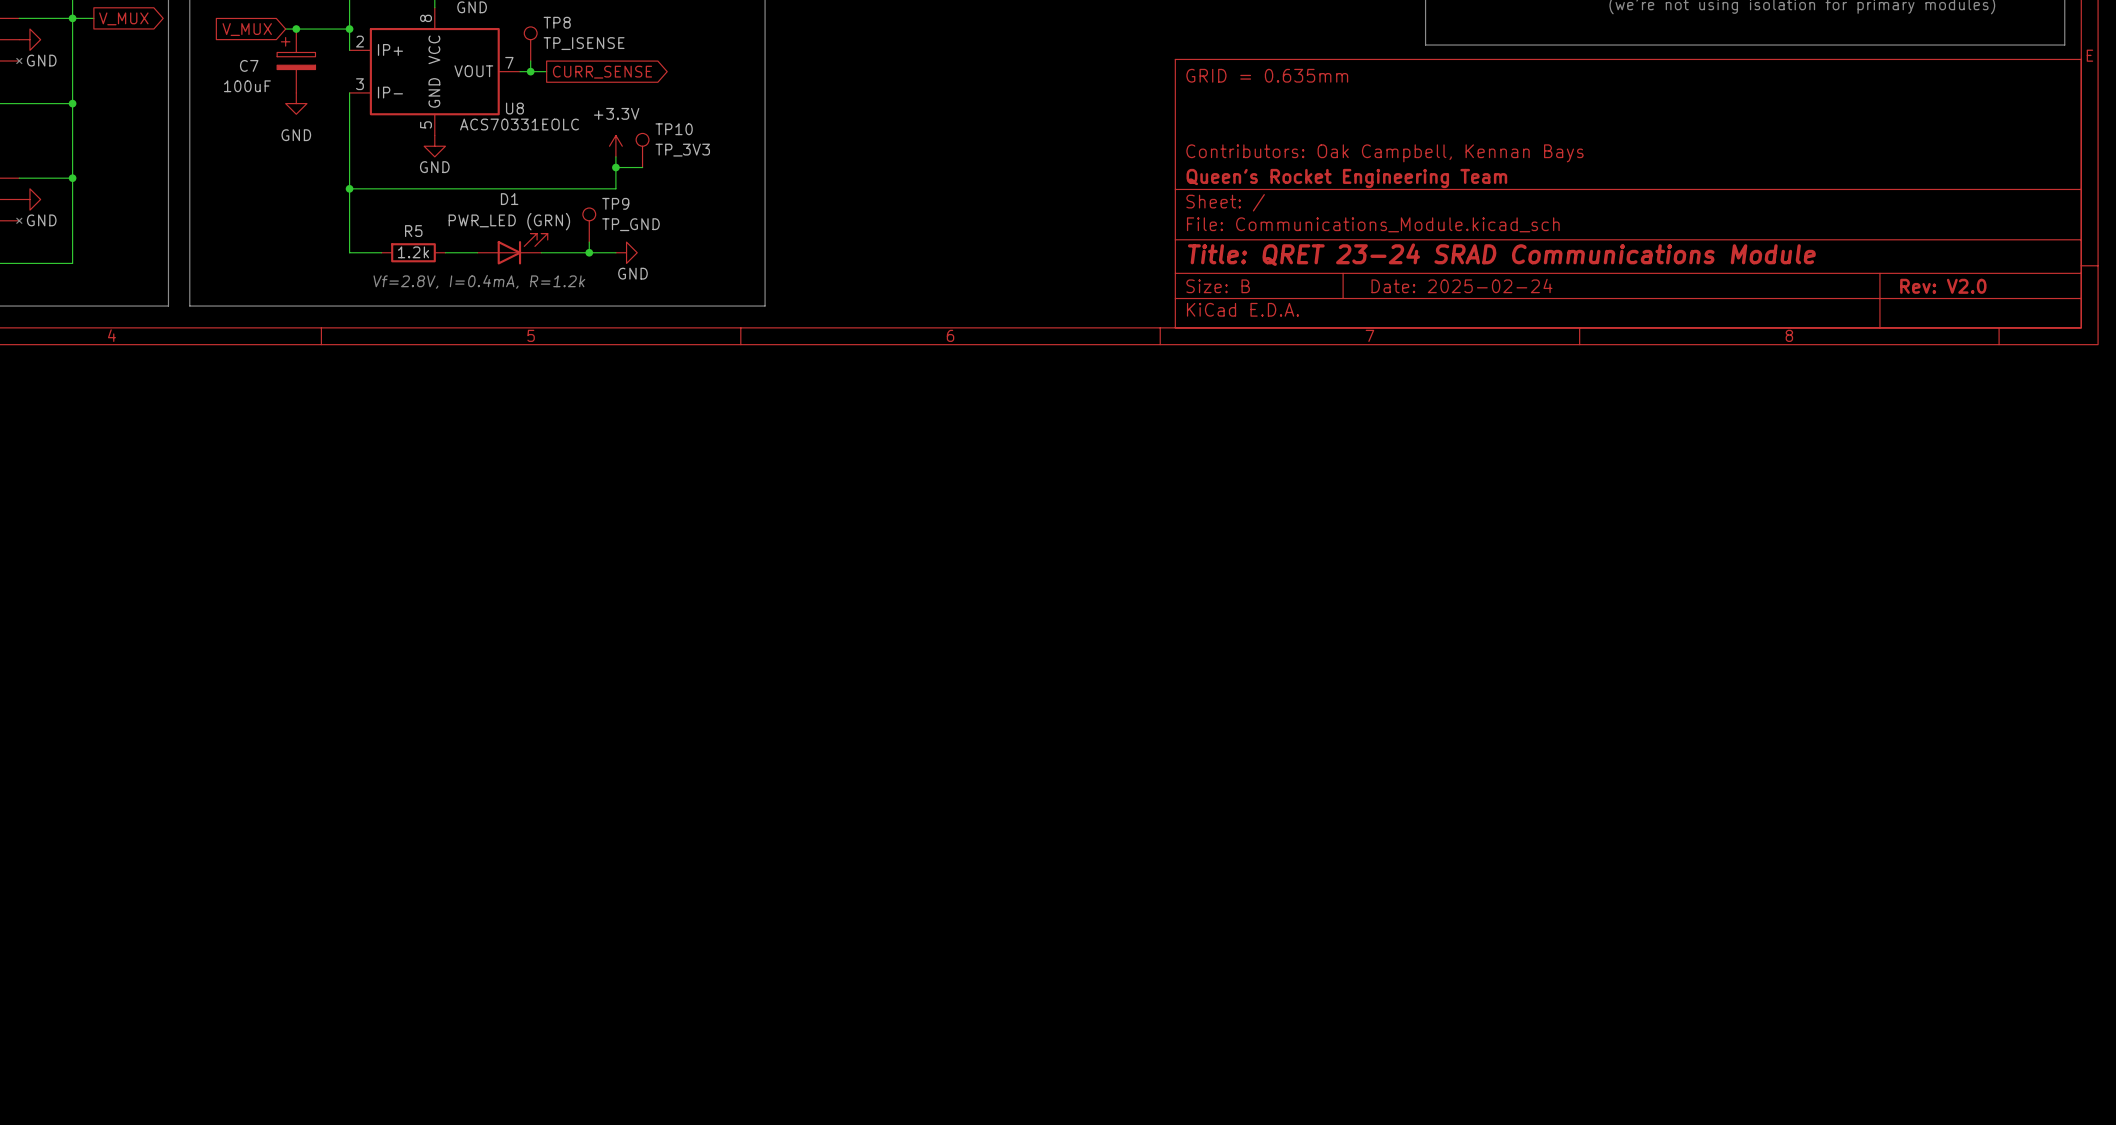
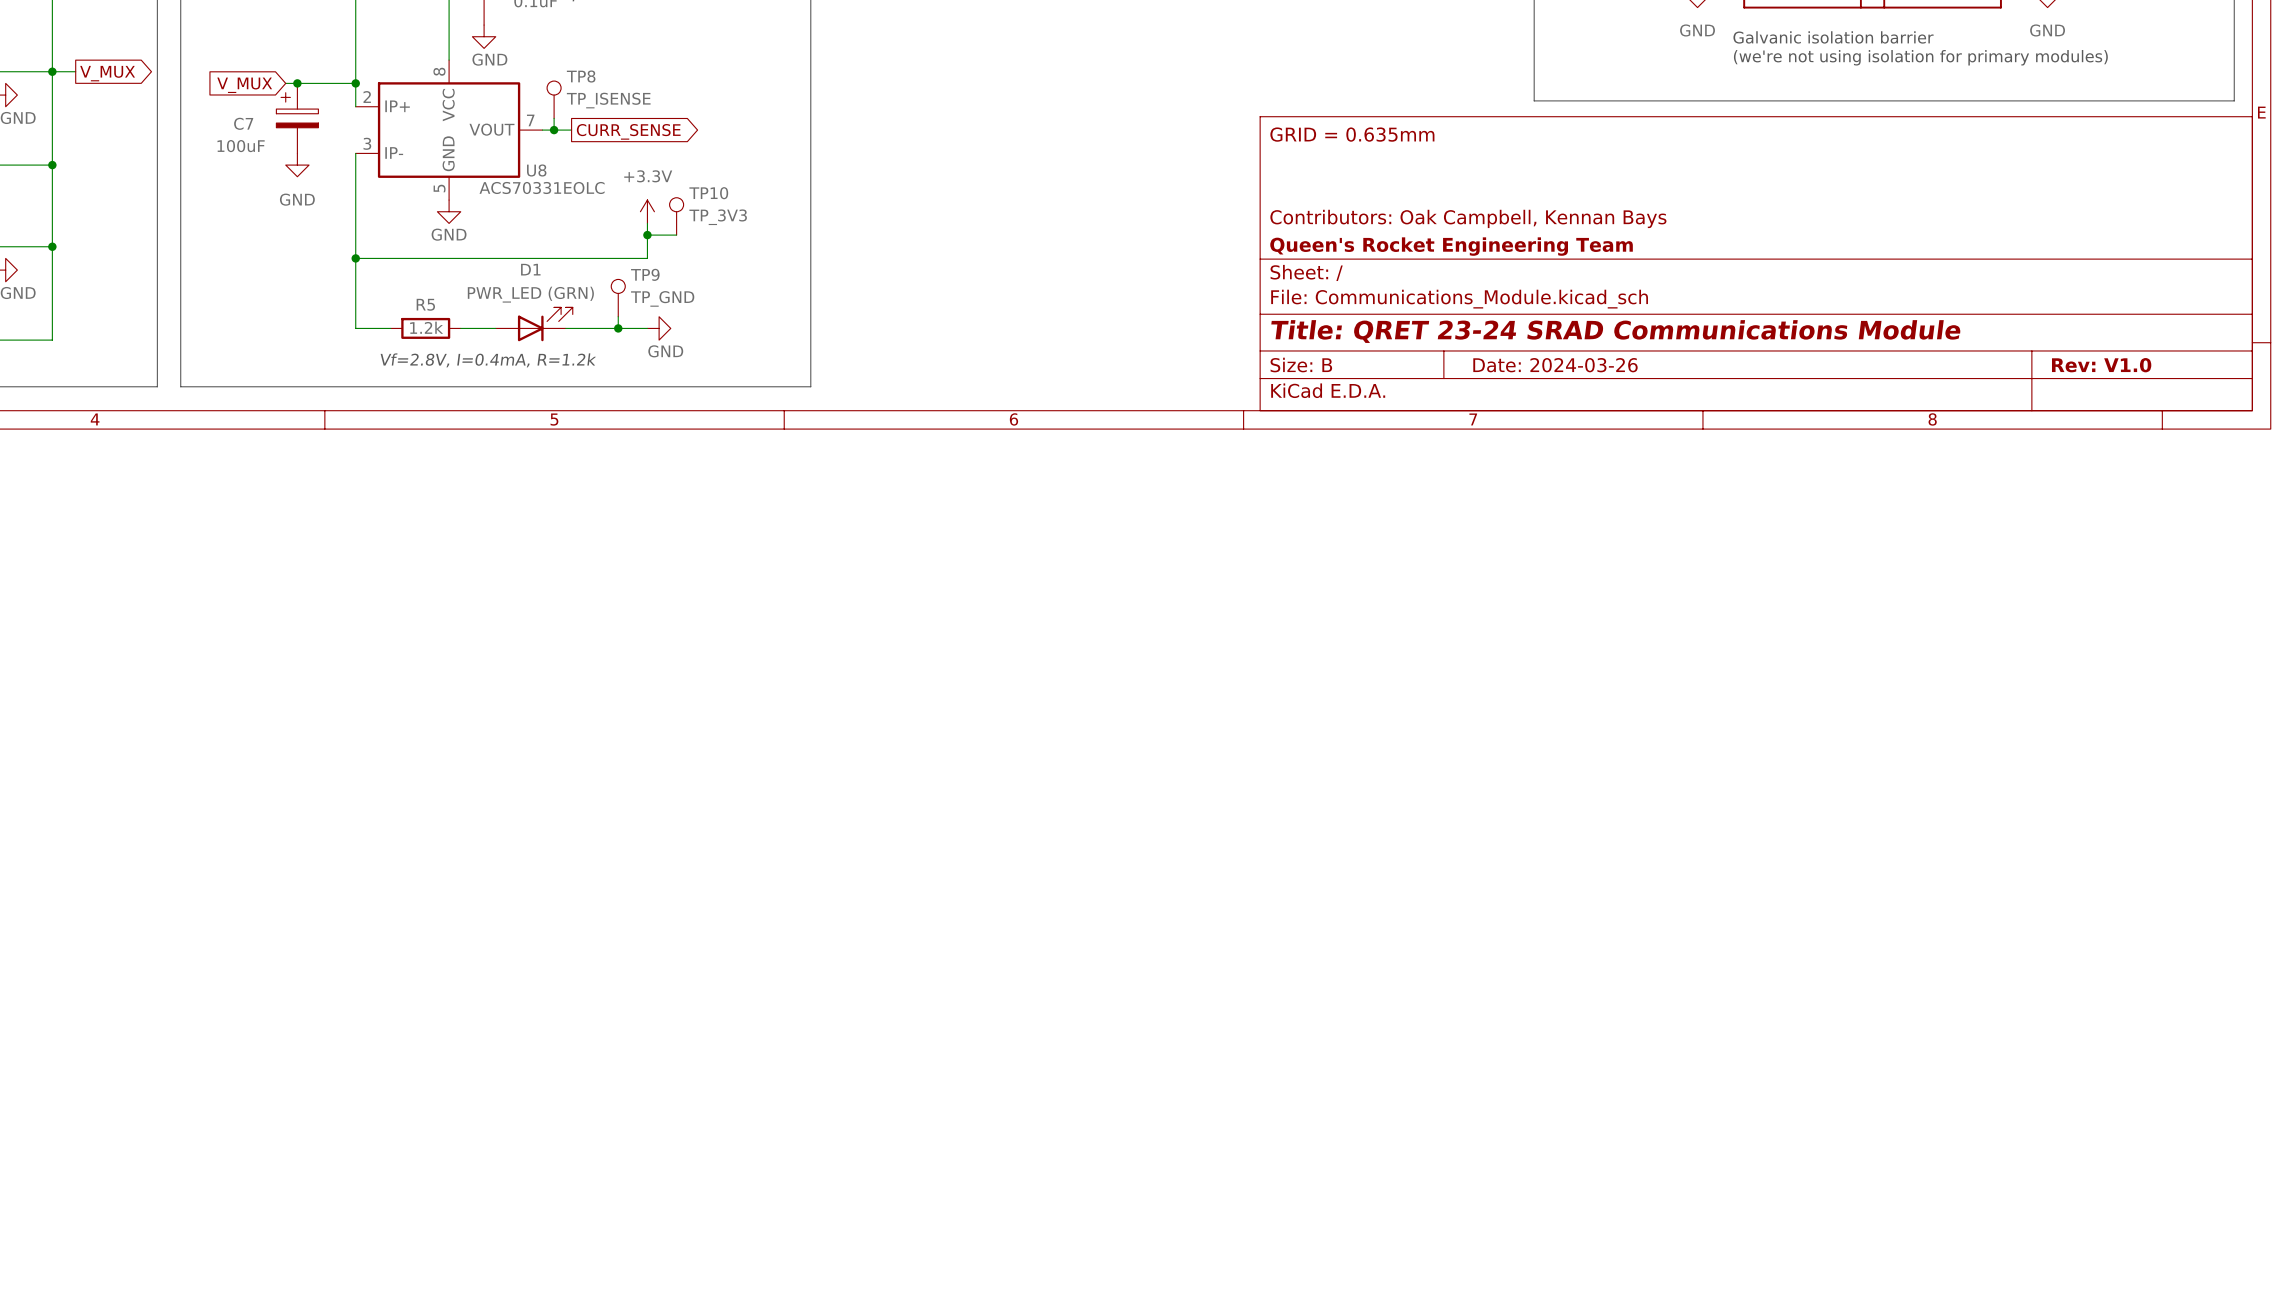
title block: Date: 2025-02-24 (1461, 286) -> Date: 2024-03-26 (1555, 365)
title block: Rev: V2.0 (1943, 286) -> Rev: V1.0 (2101, 365)

